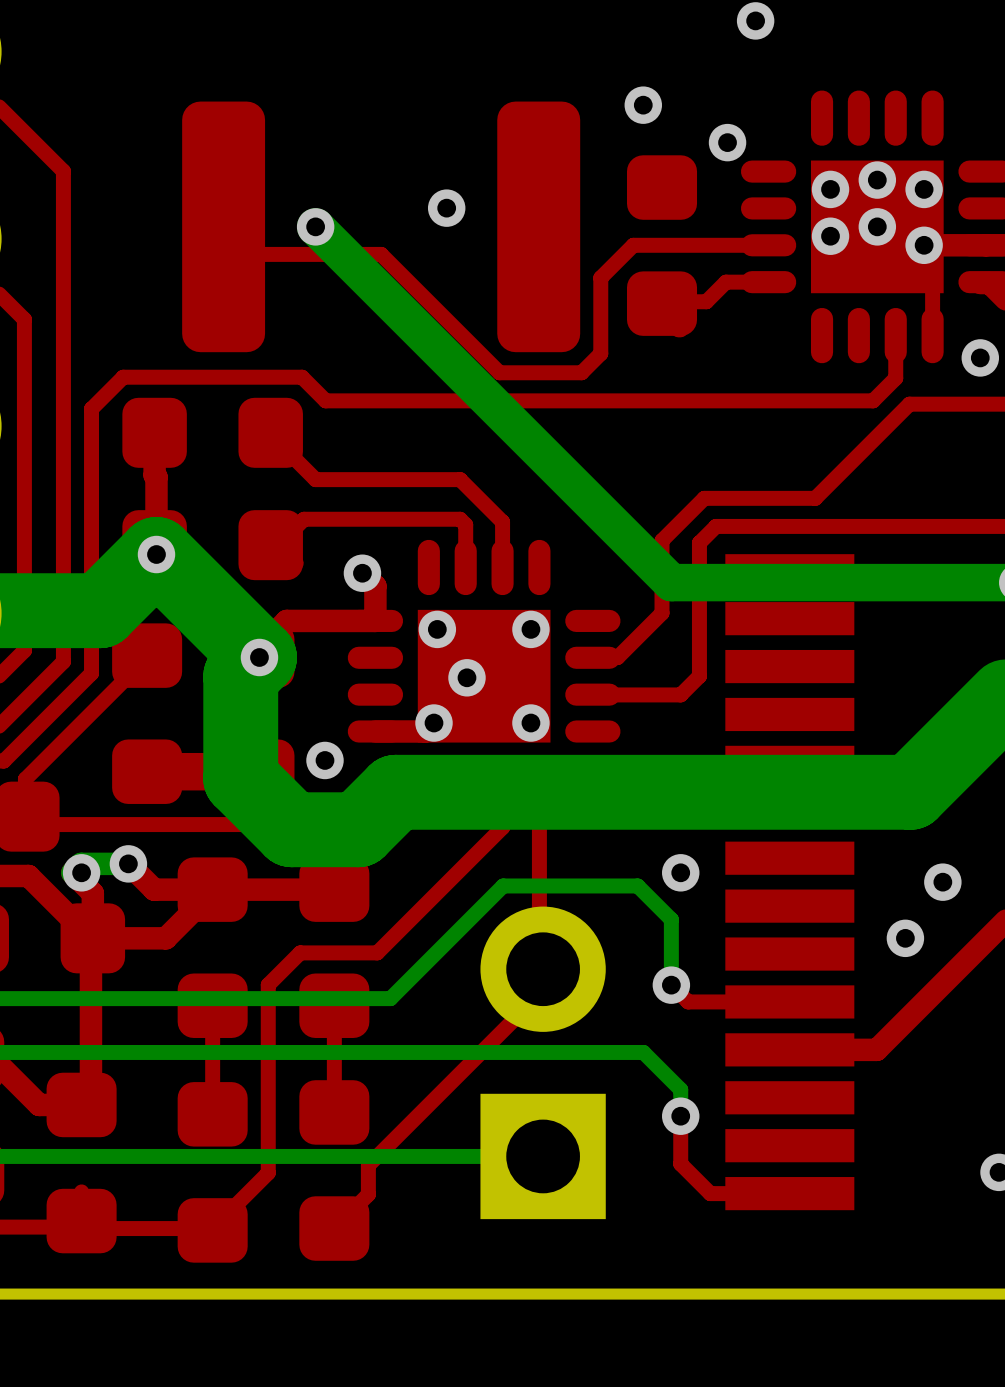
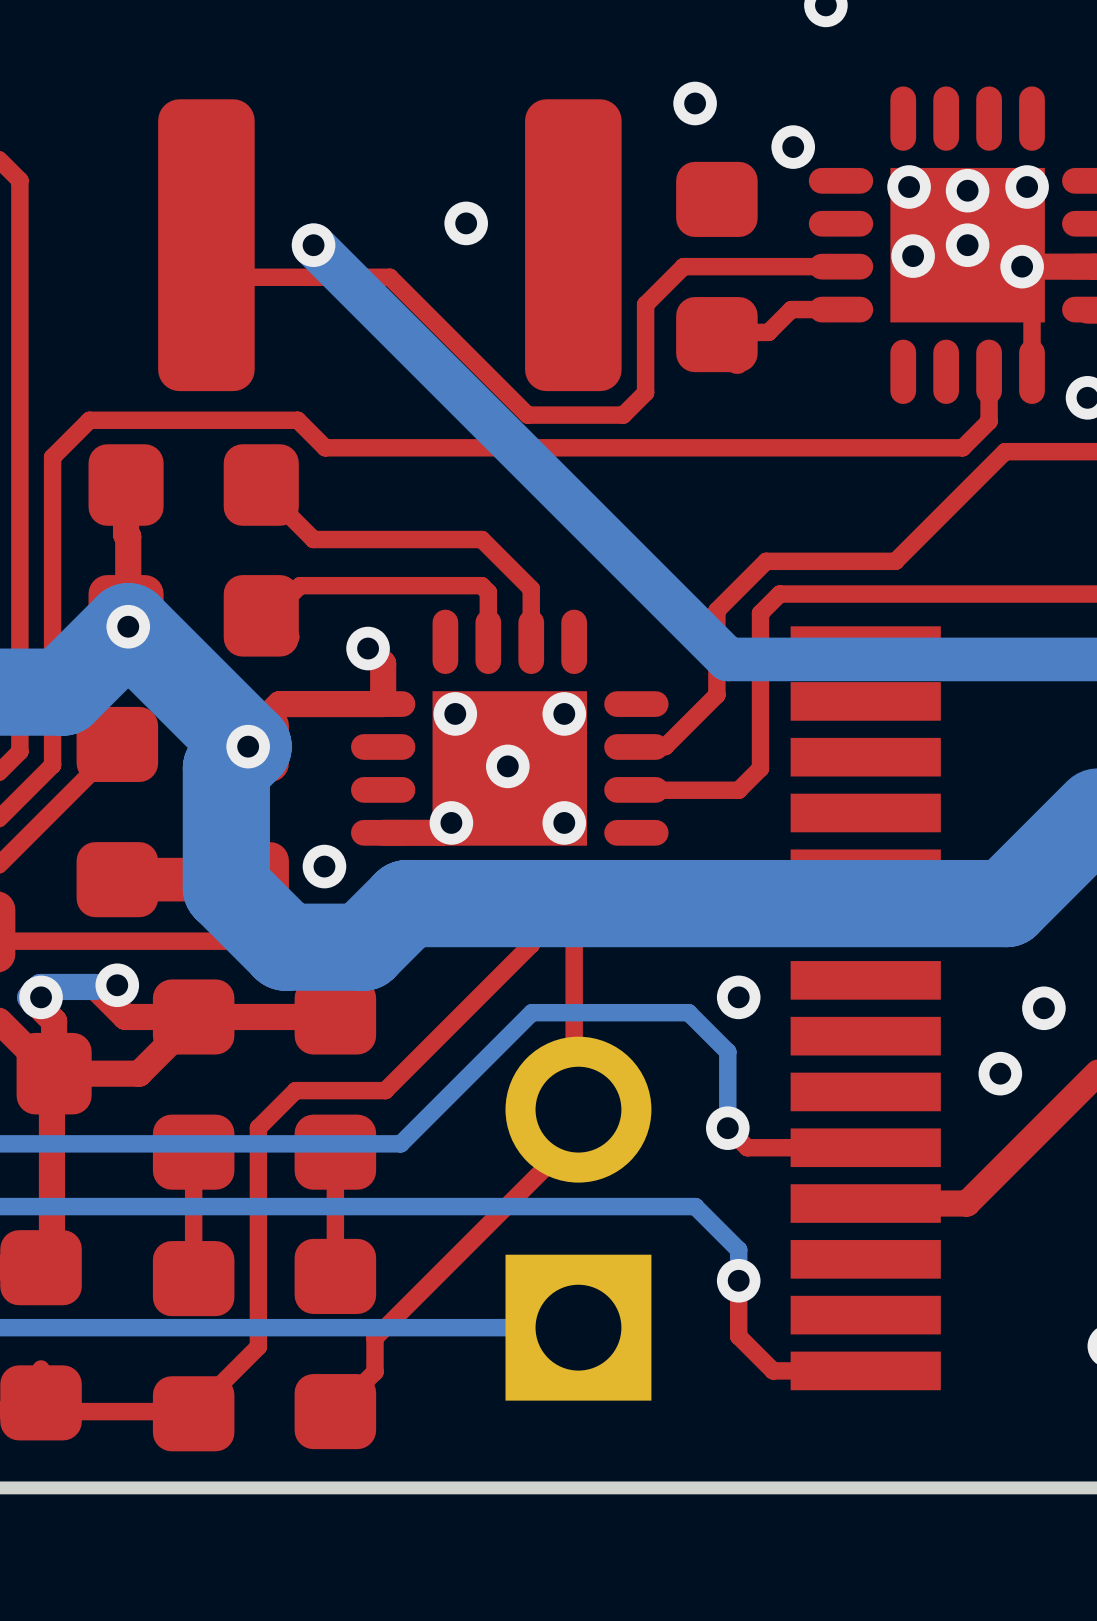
via position: (830, 189) -> (909, 187)
via position: (924, 189) -> (1027, 187)
via position: (466, 677) -> (507, 766)
via position: (128, 863) -> (117, 985)

